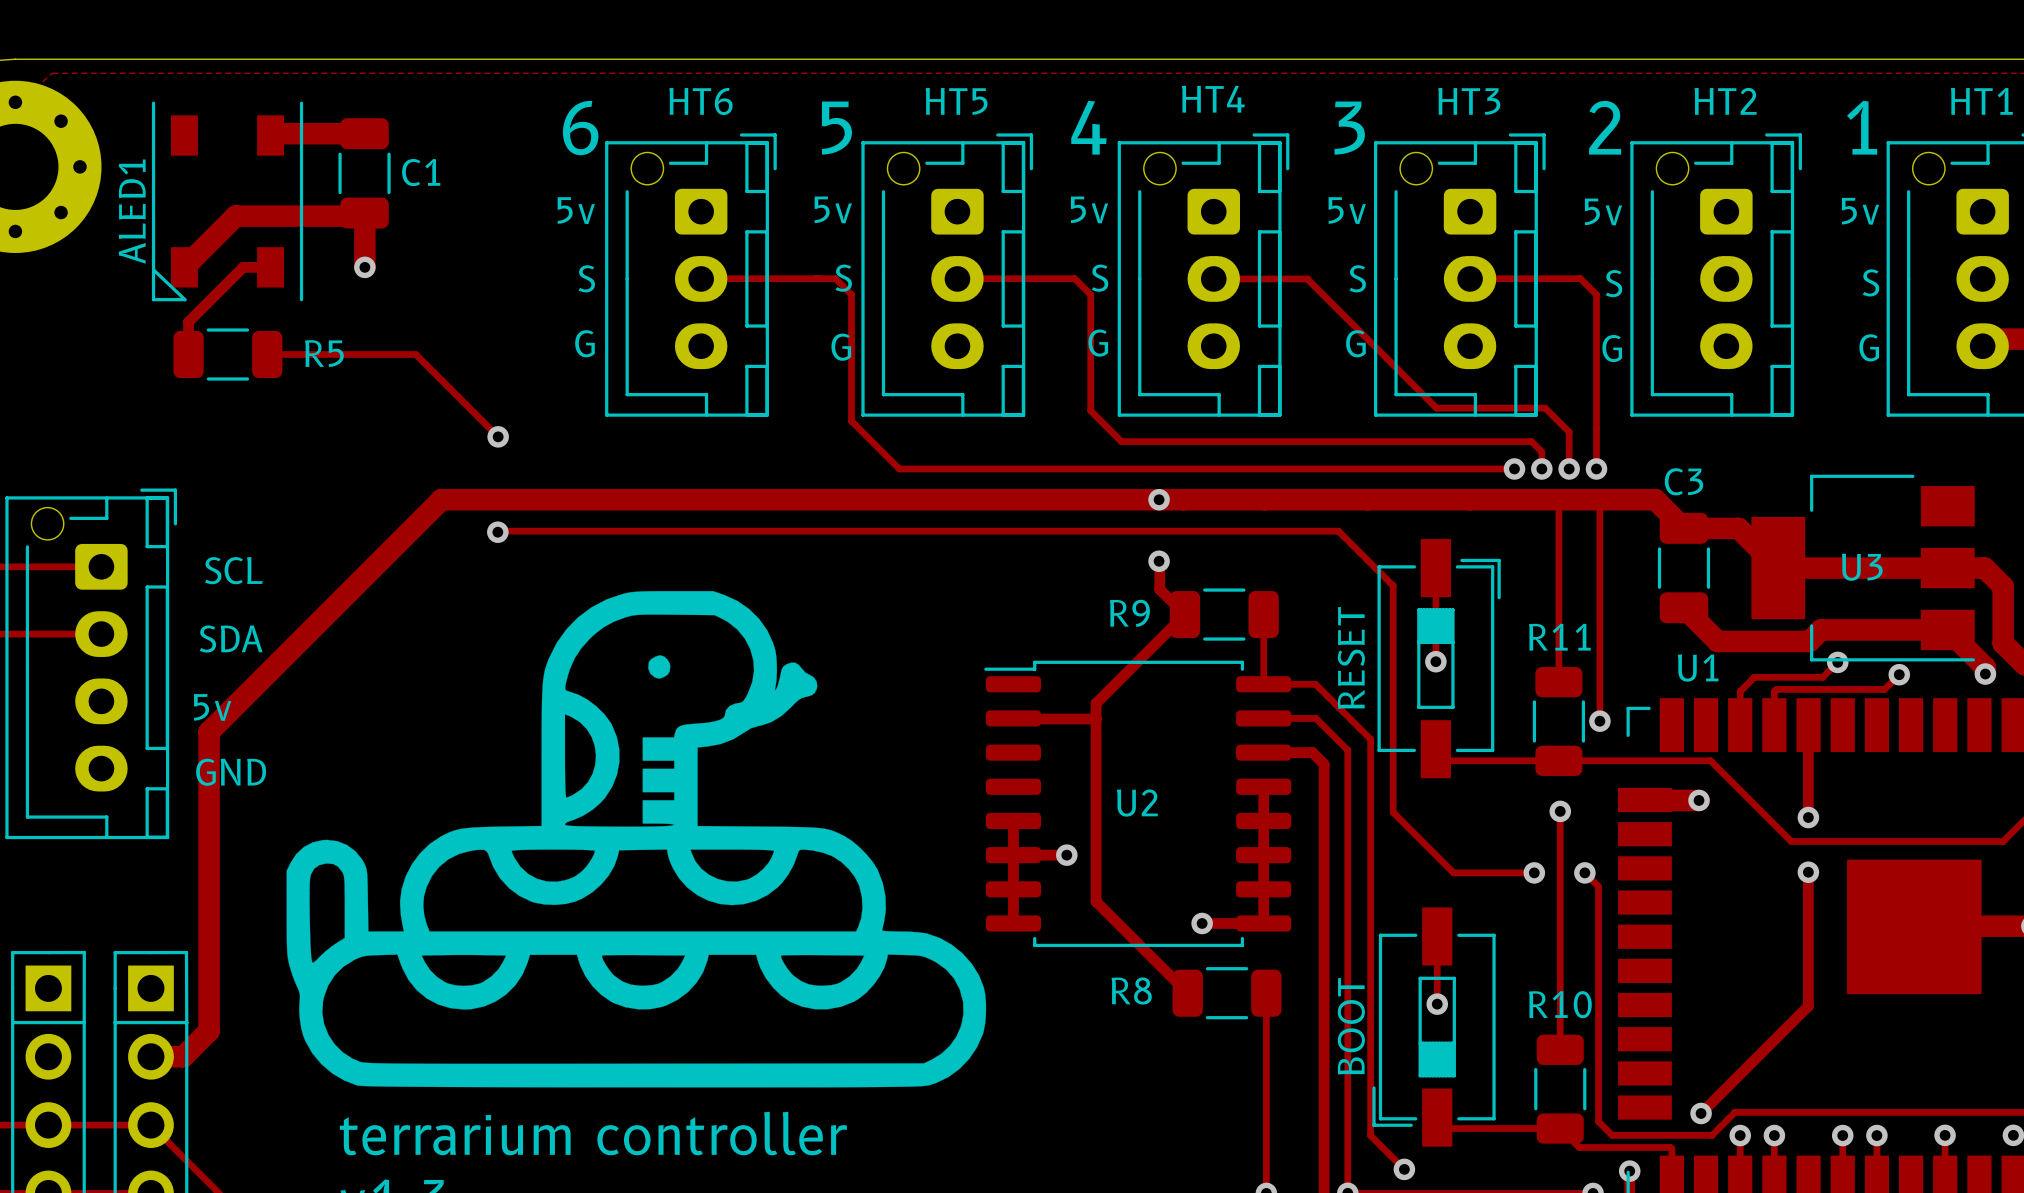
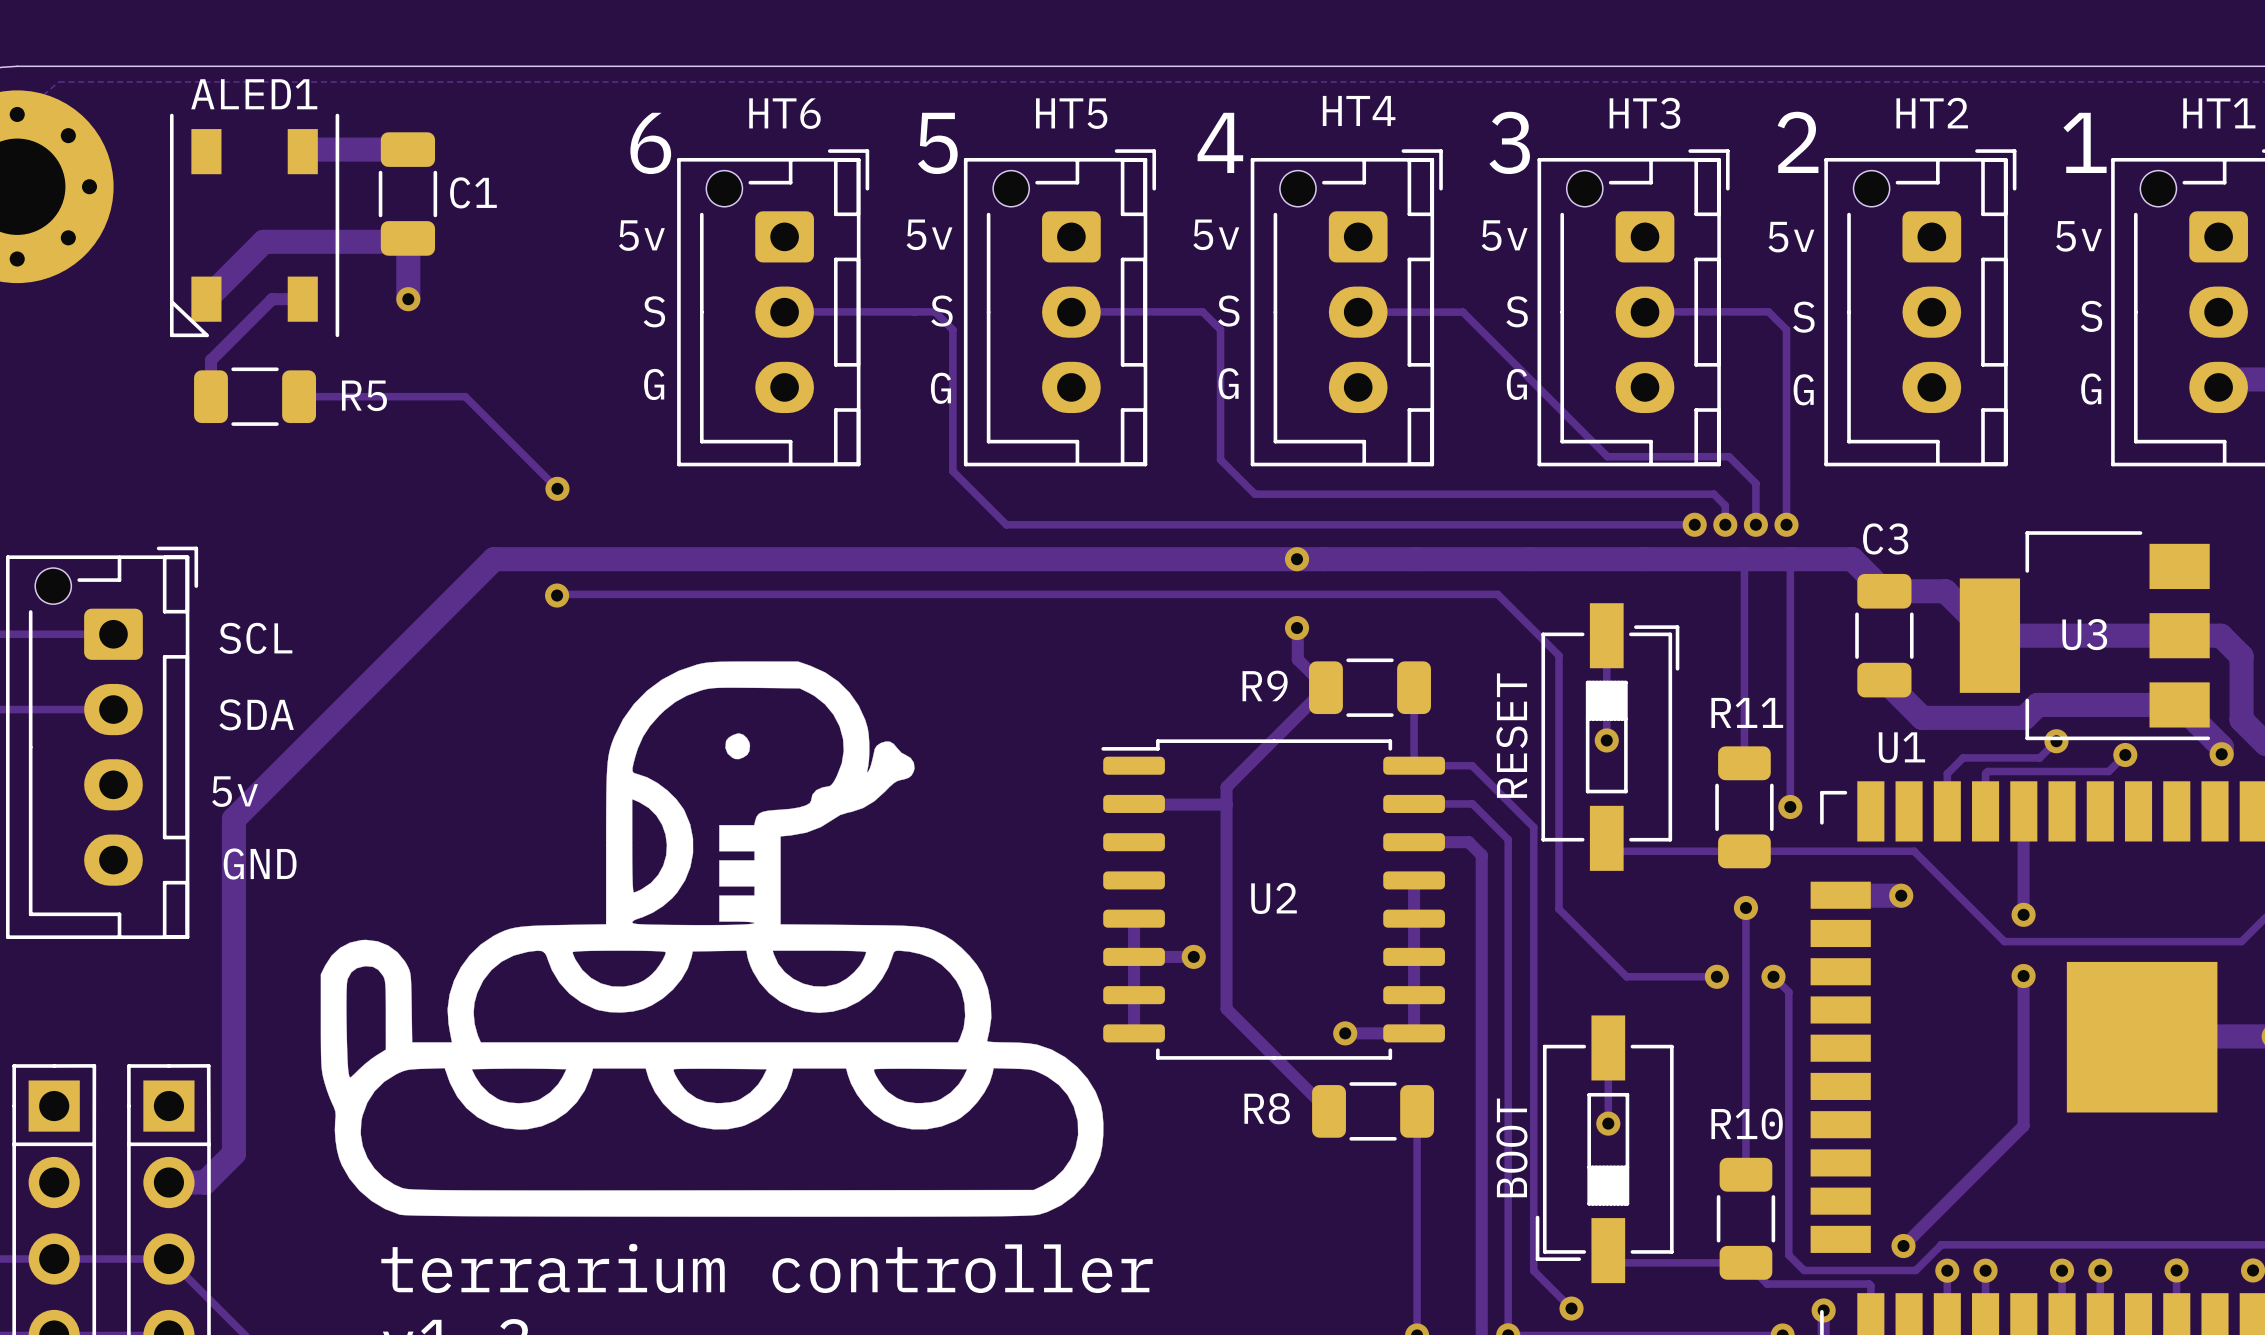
ALED1 name rotation: 0° (132, 211) -> 90° clockwise (254, 94)
ALED1 name position: ALED1 (132, 211) -> ALED1 (254, 94)

